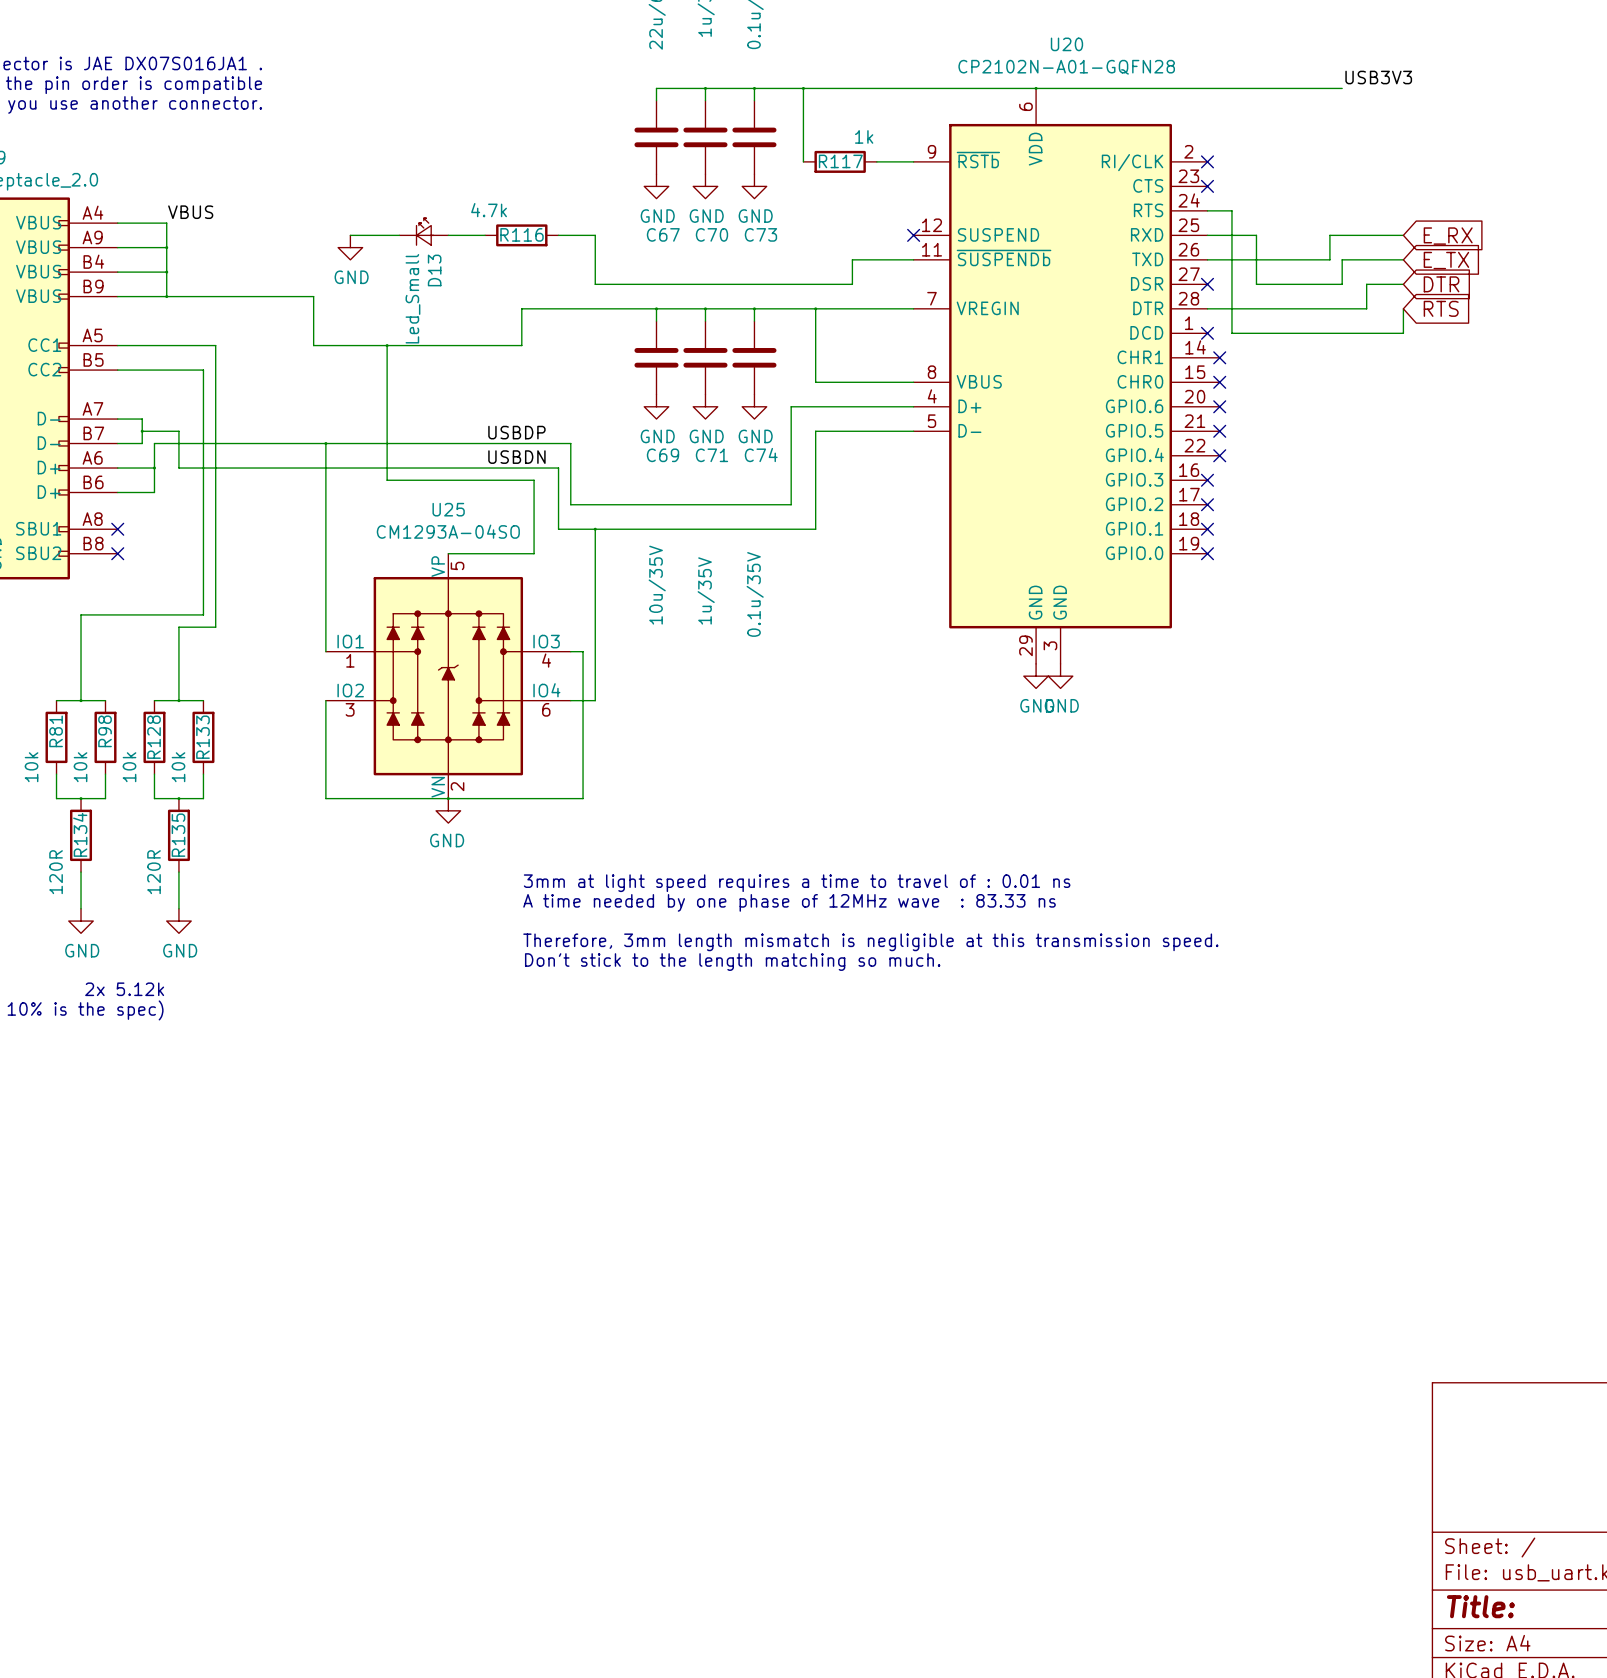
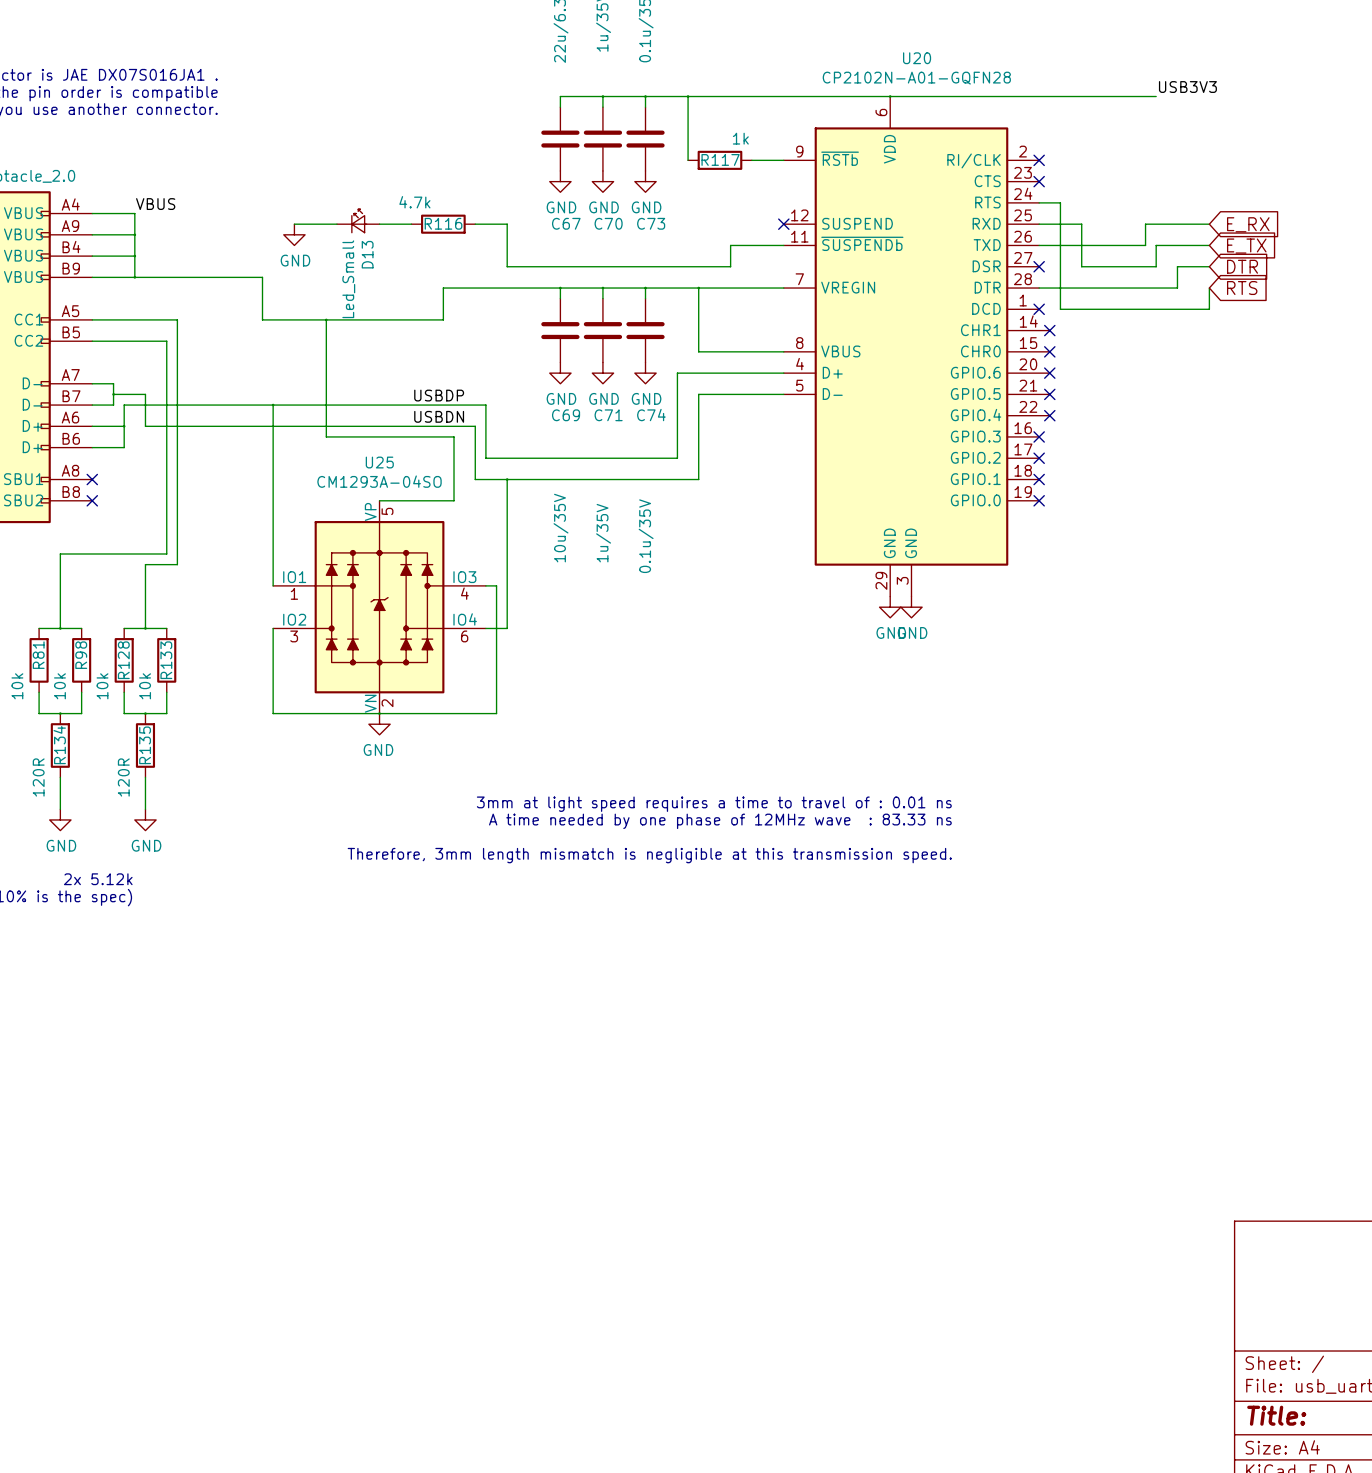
text: 3mm at light speed requires a time to travel of : 0.01 ns (797, 883) -> none
text: A time needed by one phase of 12MHz wave : 83.33 ns (789, 902) -> none
text: none -> 3mm at light speed requires a time to travel of : 0.01 ns (714, 804)
text: none -> A time needed by one phase of 12MHz wave : 83.33 ns (720, 821)
text: Therefore, 3mm length mismatch is negligible at this transmission speed. (870, 942) -> none
text: Don't stick to the length matching so much. (732, 962) -> none
text: none -> Therefore, 3mm length mismatch is negligible at this transmission speed. (649, 855)

